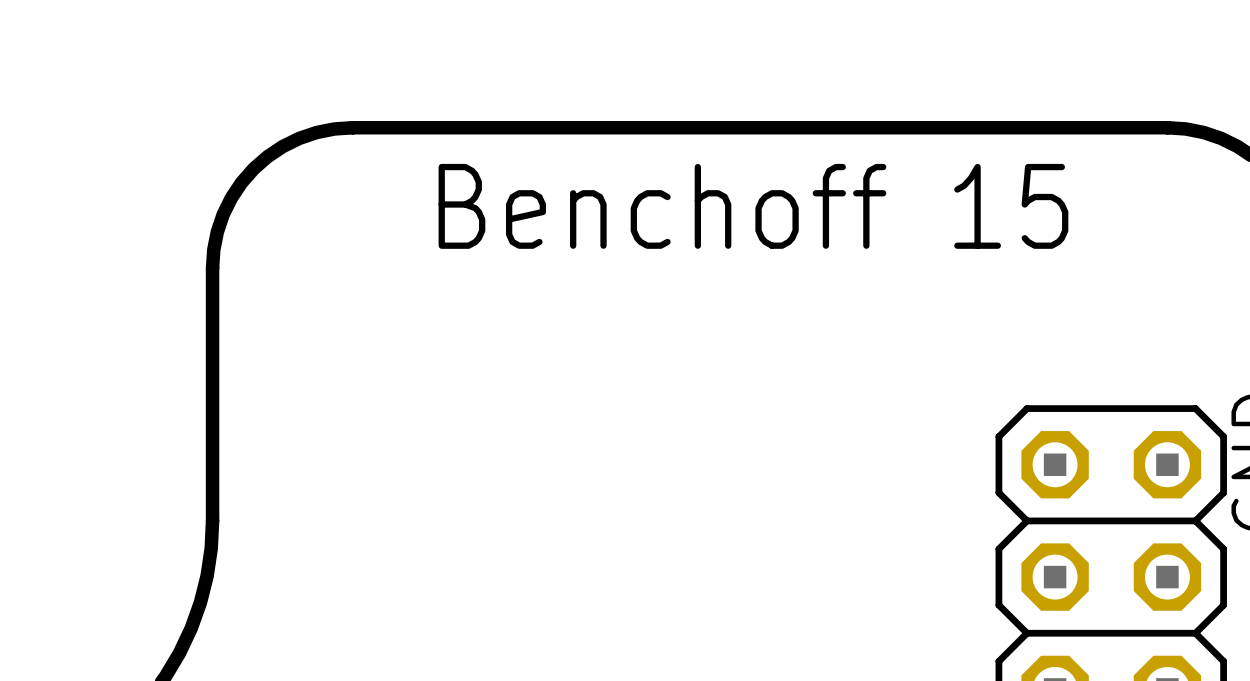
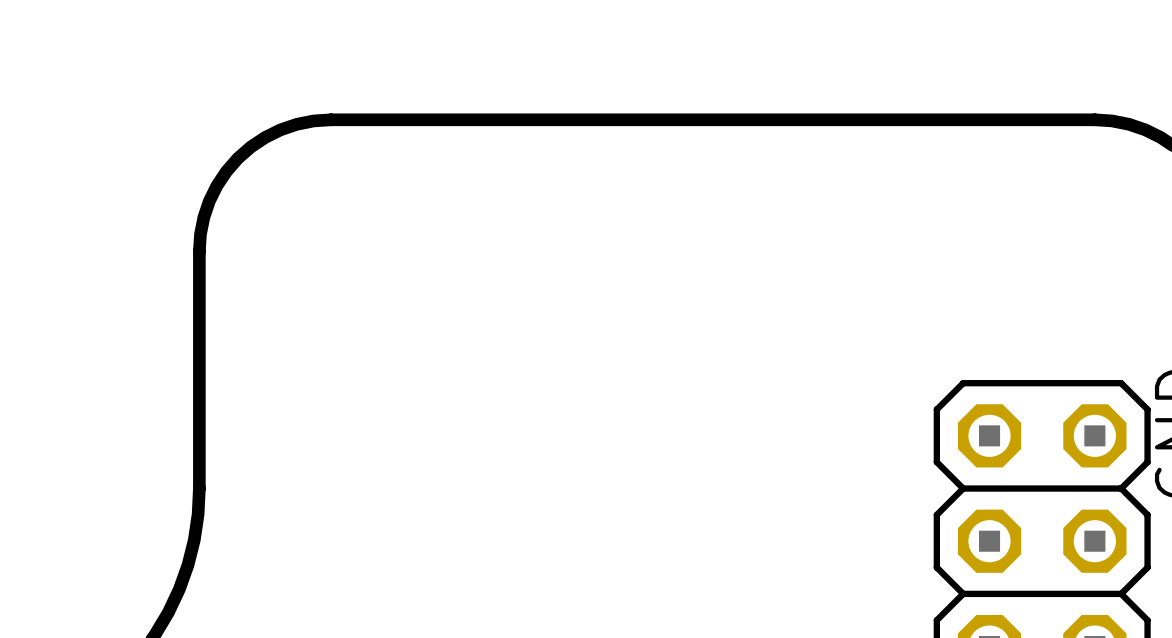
text: Benchoff 15 (753, 206) -> none

